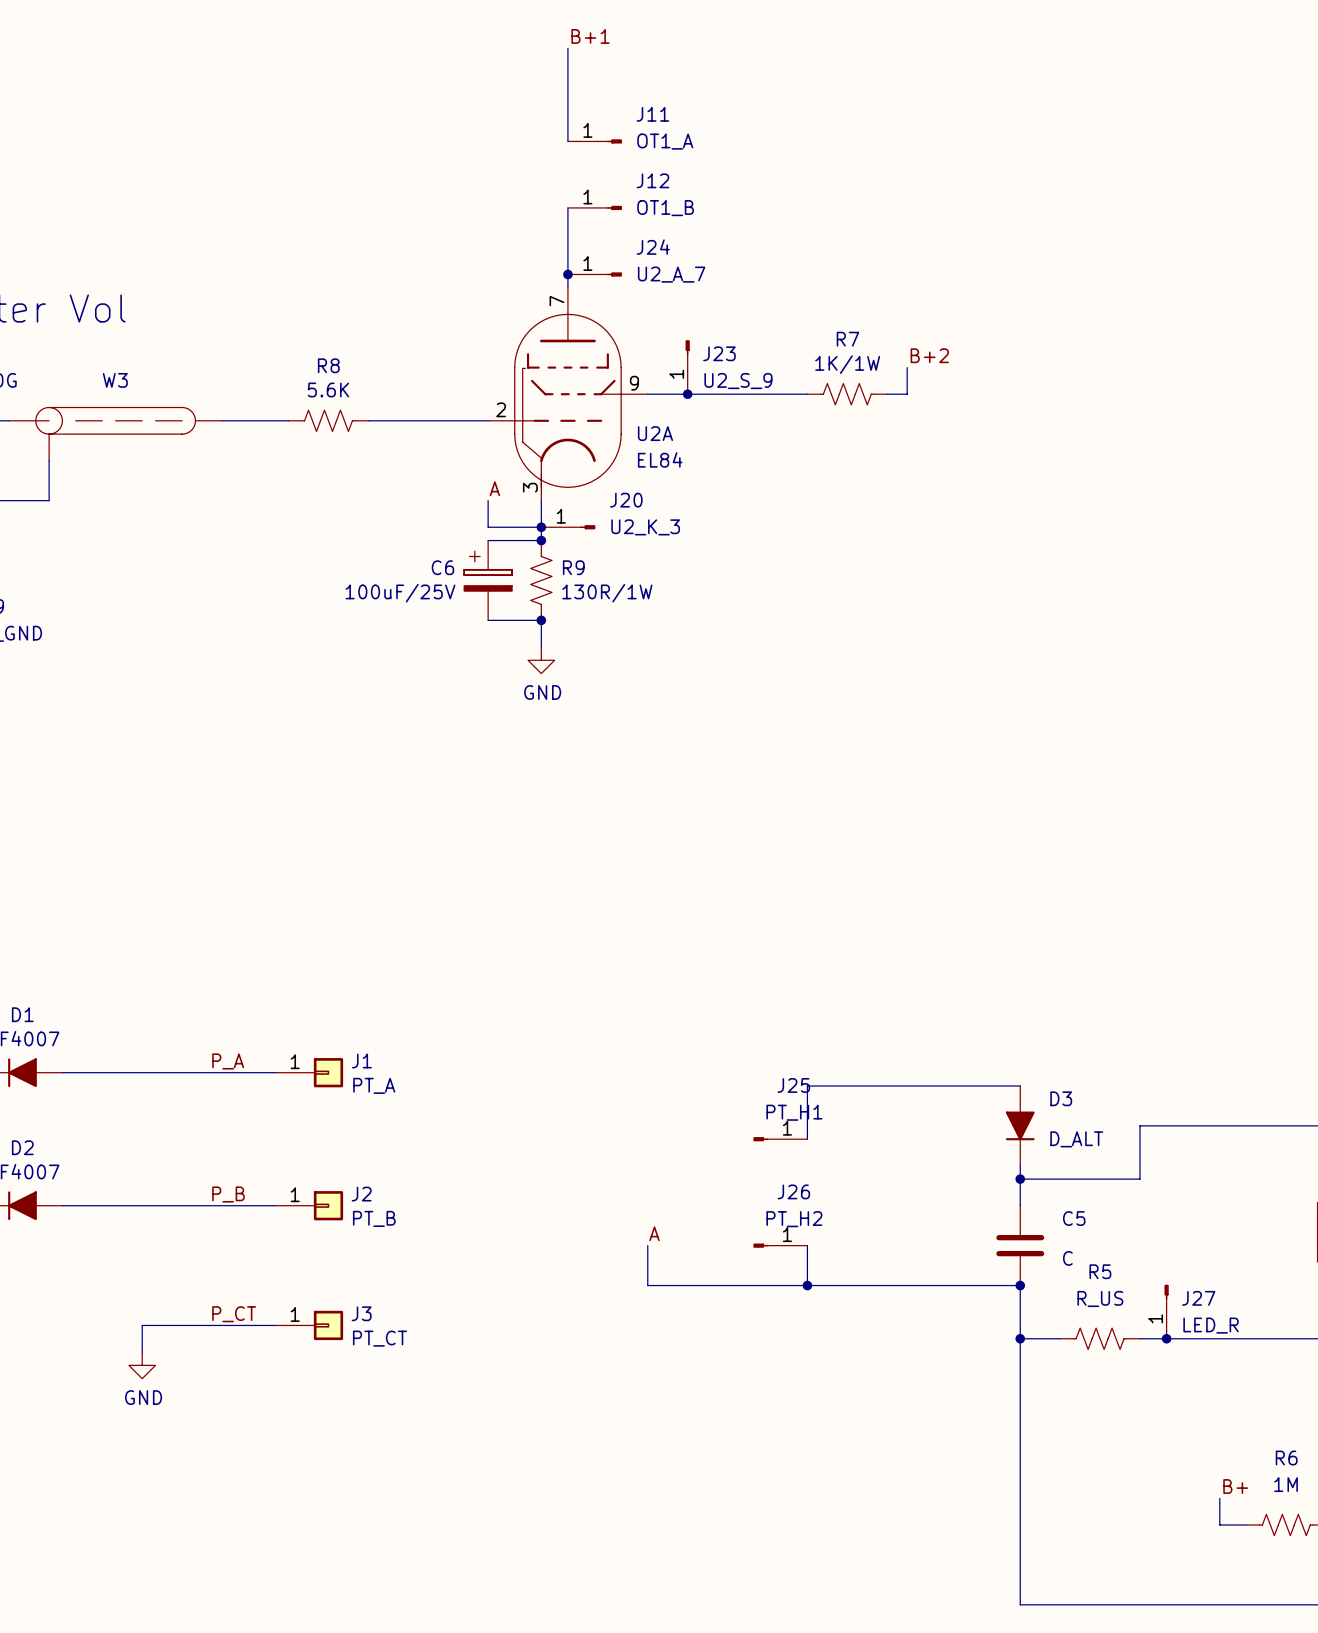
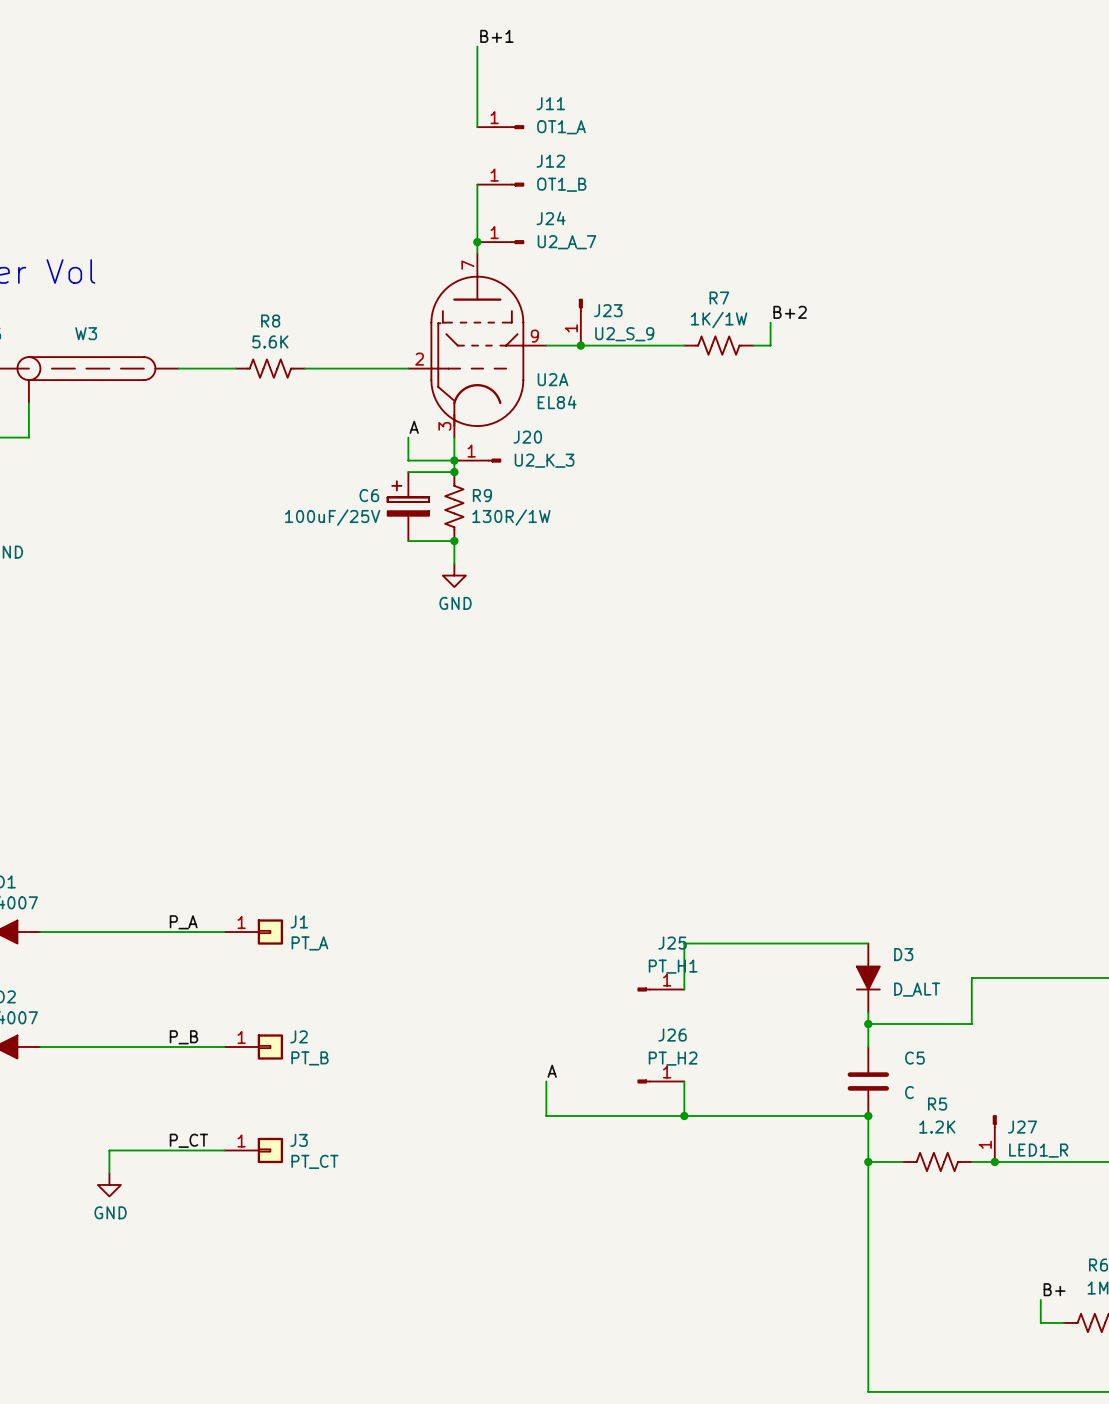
R5 value: R_US (1100, 1298) -> 1.2K (937, 1127)
J27 value: LED_R (1211, 1325) -> LED1_R (1038, 1150)

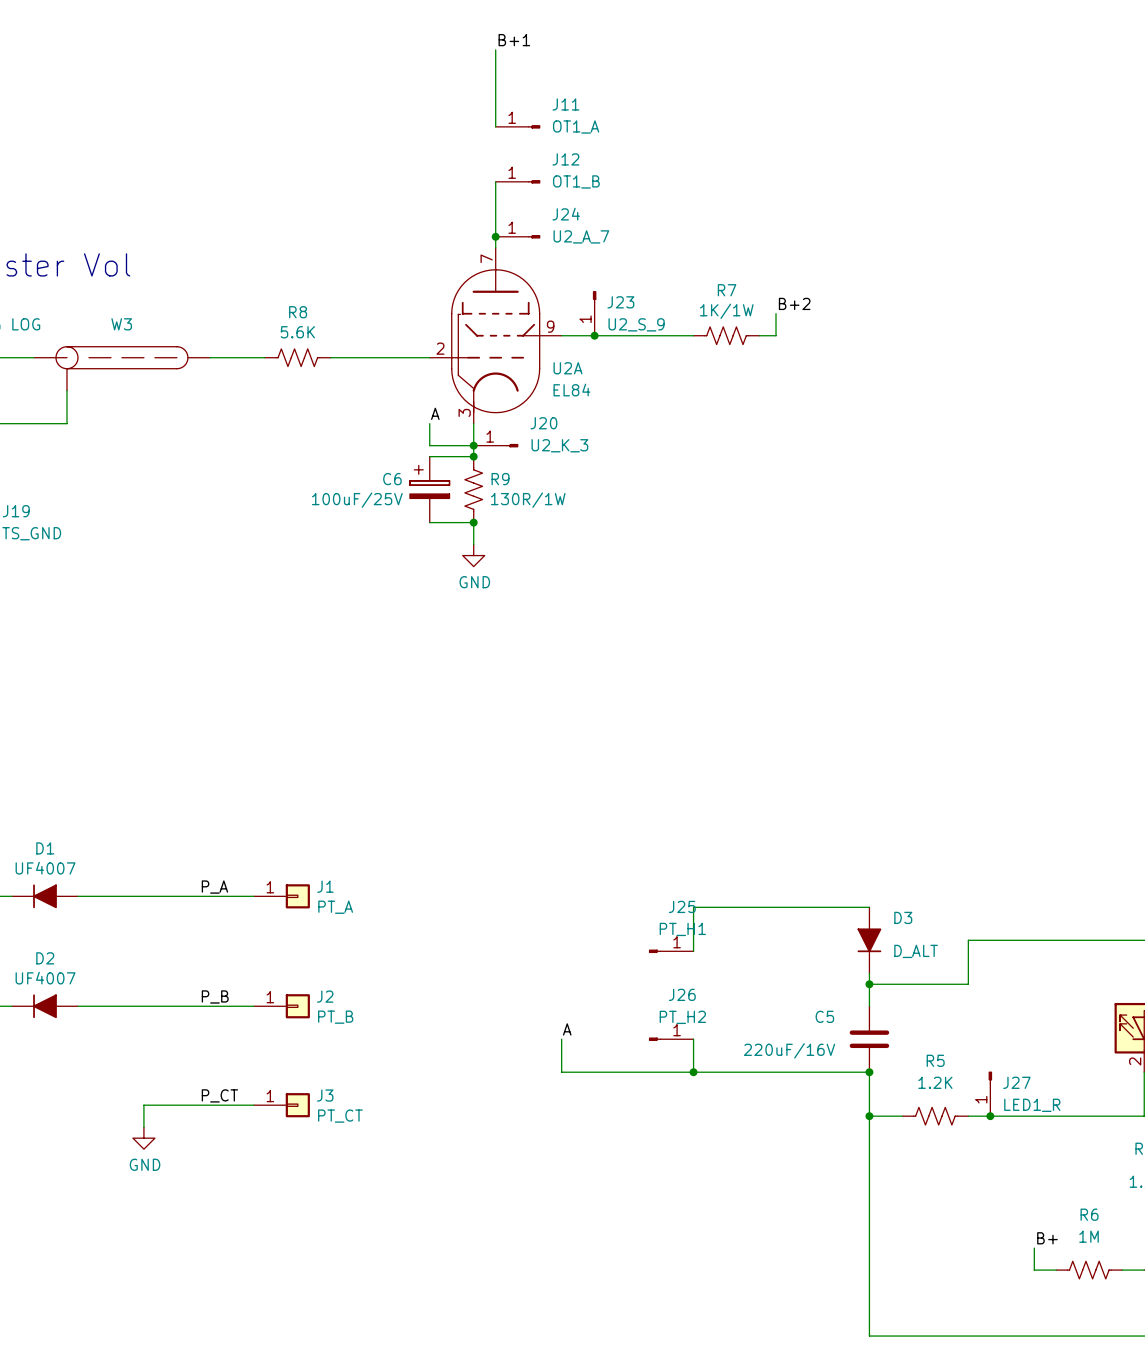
C5 name position: C5 (914, 1058) -> C5 (824, 1016)
C5 value: C (909, 1092) -> 220uF/16V (789, 1050)

